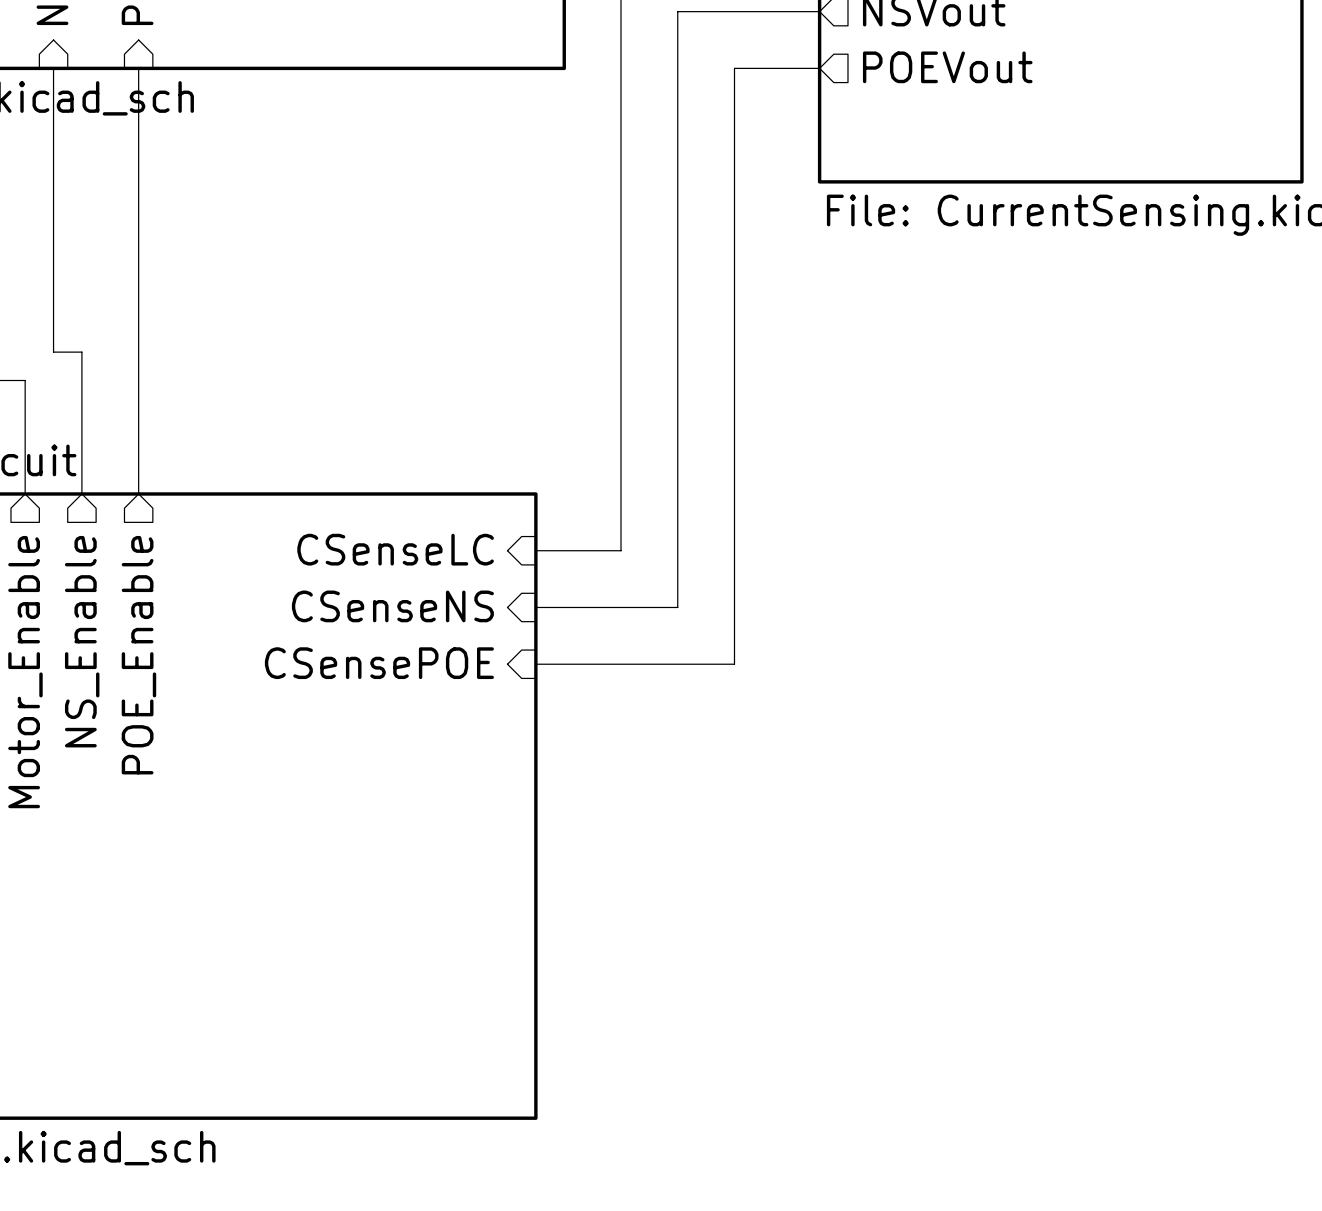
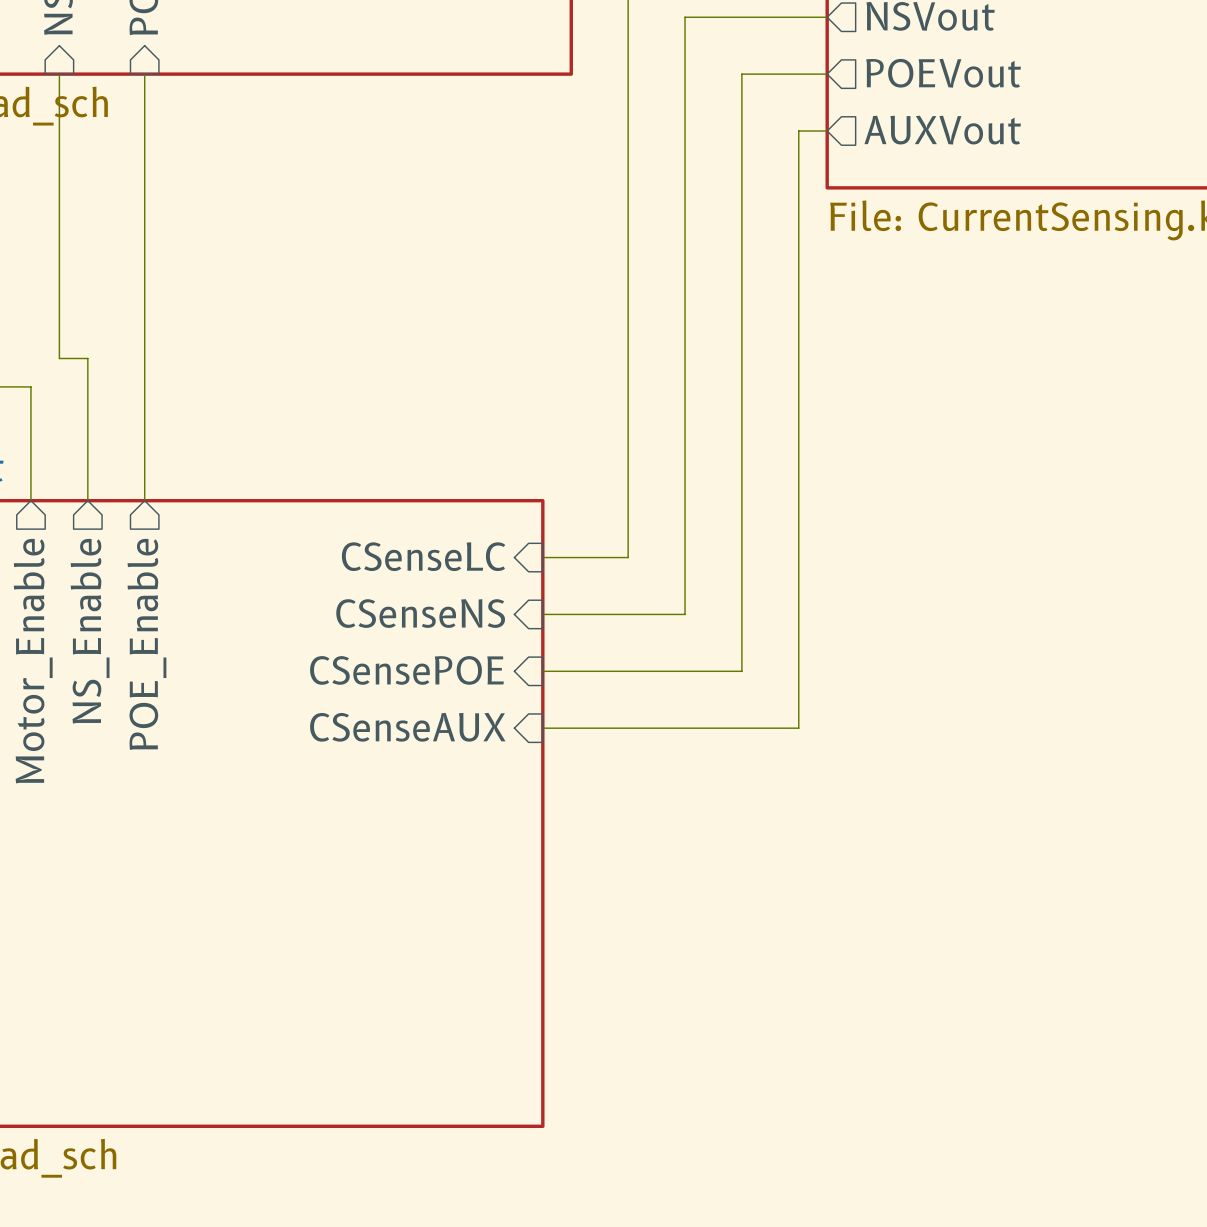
sheet pin: none -> AUXVout (942, 130)
wire: none -> (827, 131) (798, 131) (798, 728) (542, 728)
sheet pin: none -> CSenseAUX (407, 727)

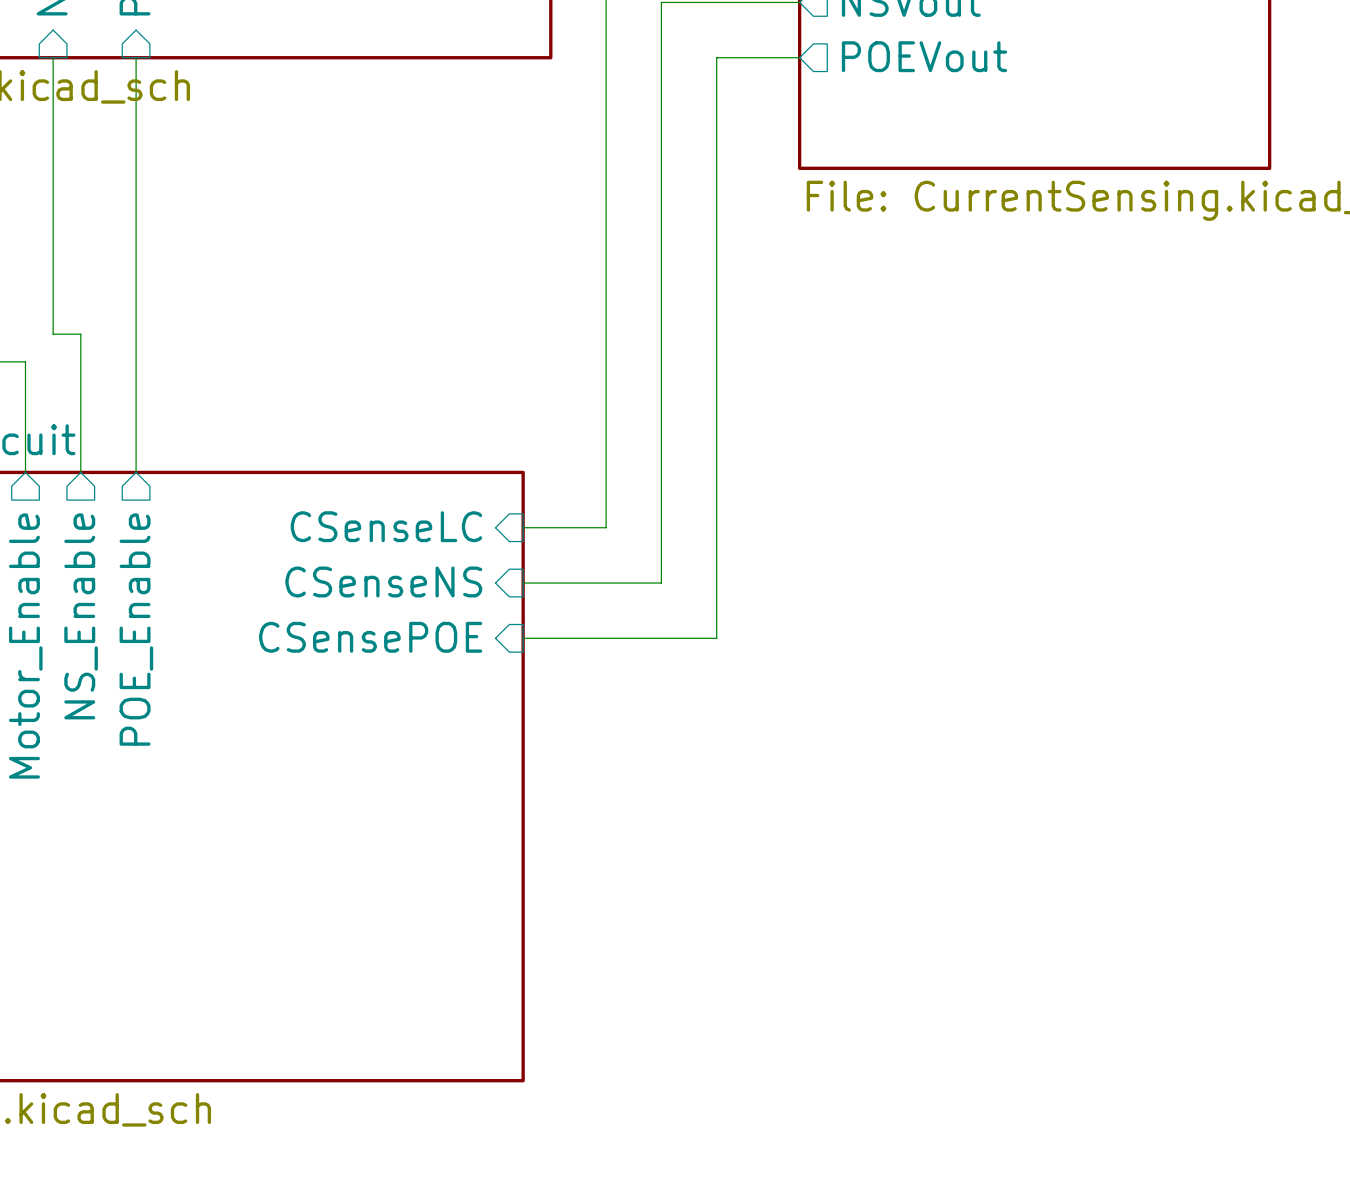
sheet pin: AUXVout (942, 130) -> none
wire: (827, 131) (798, 131) (798, 728) (542, 728) -> none
sheet pin: CSenseAUX (407, 727) -> none

